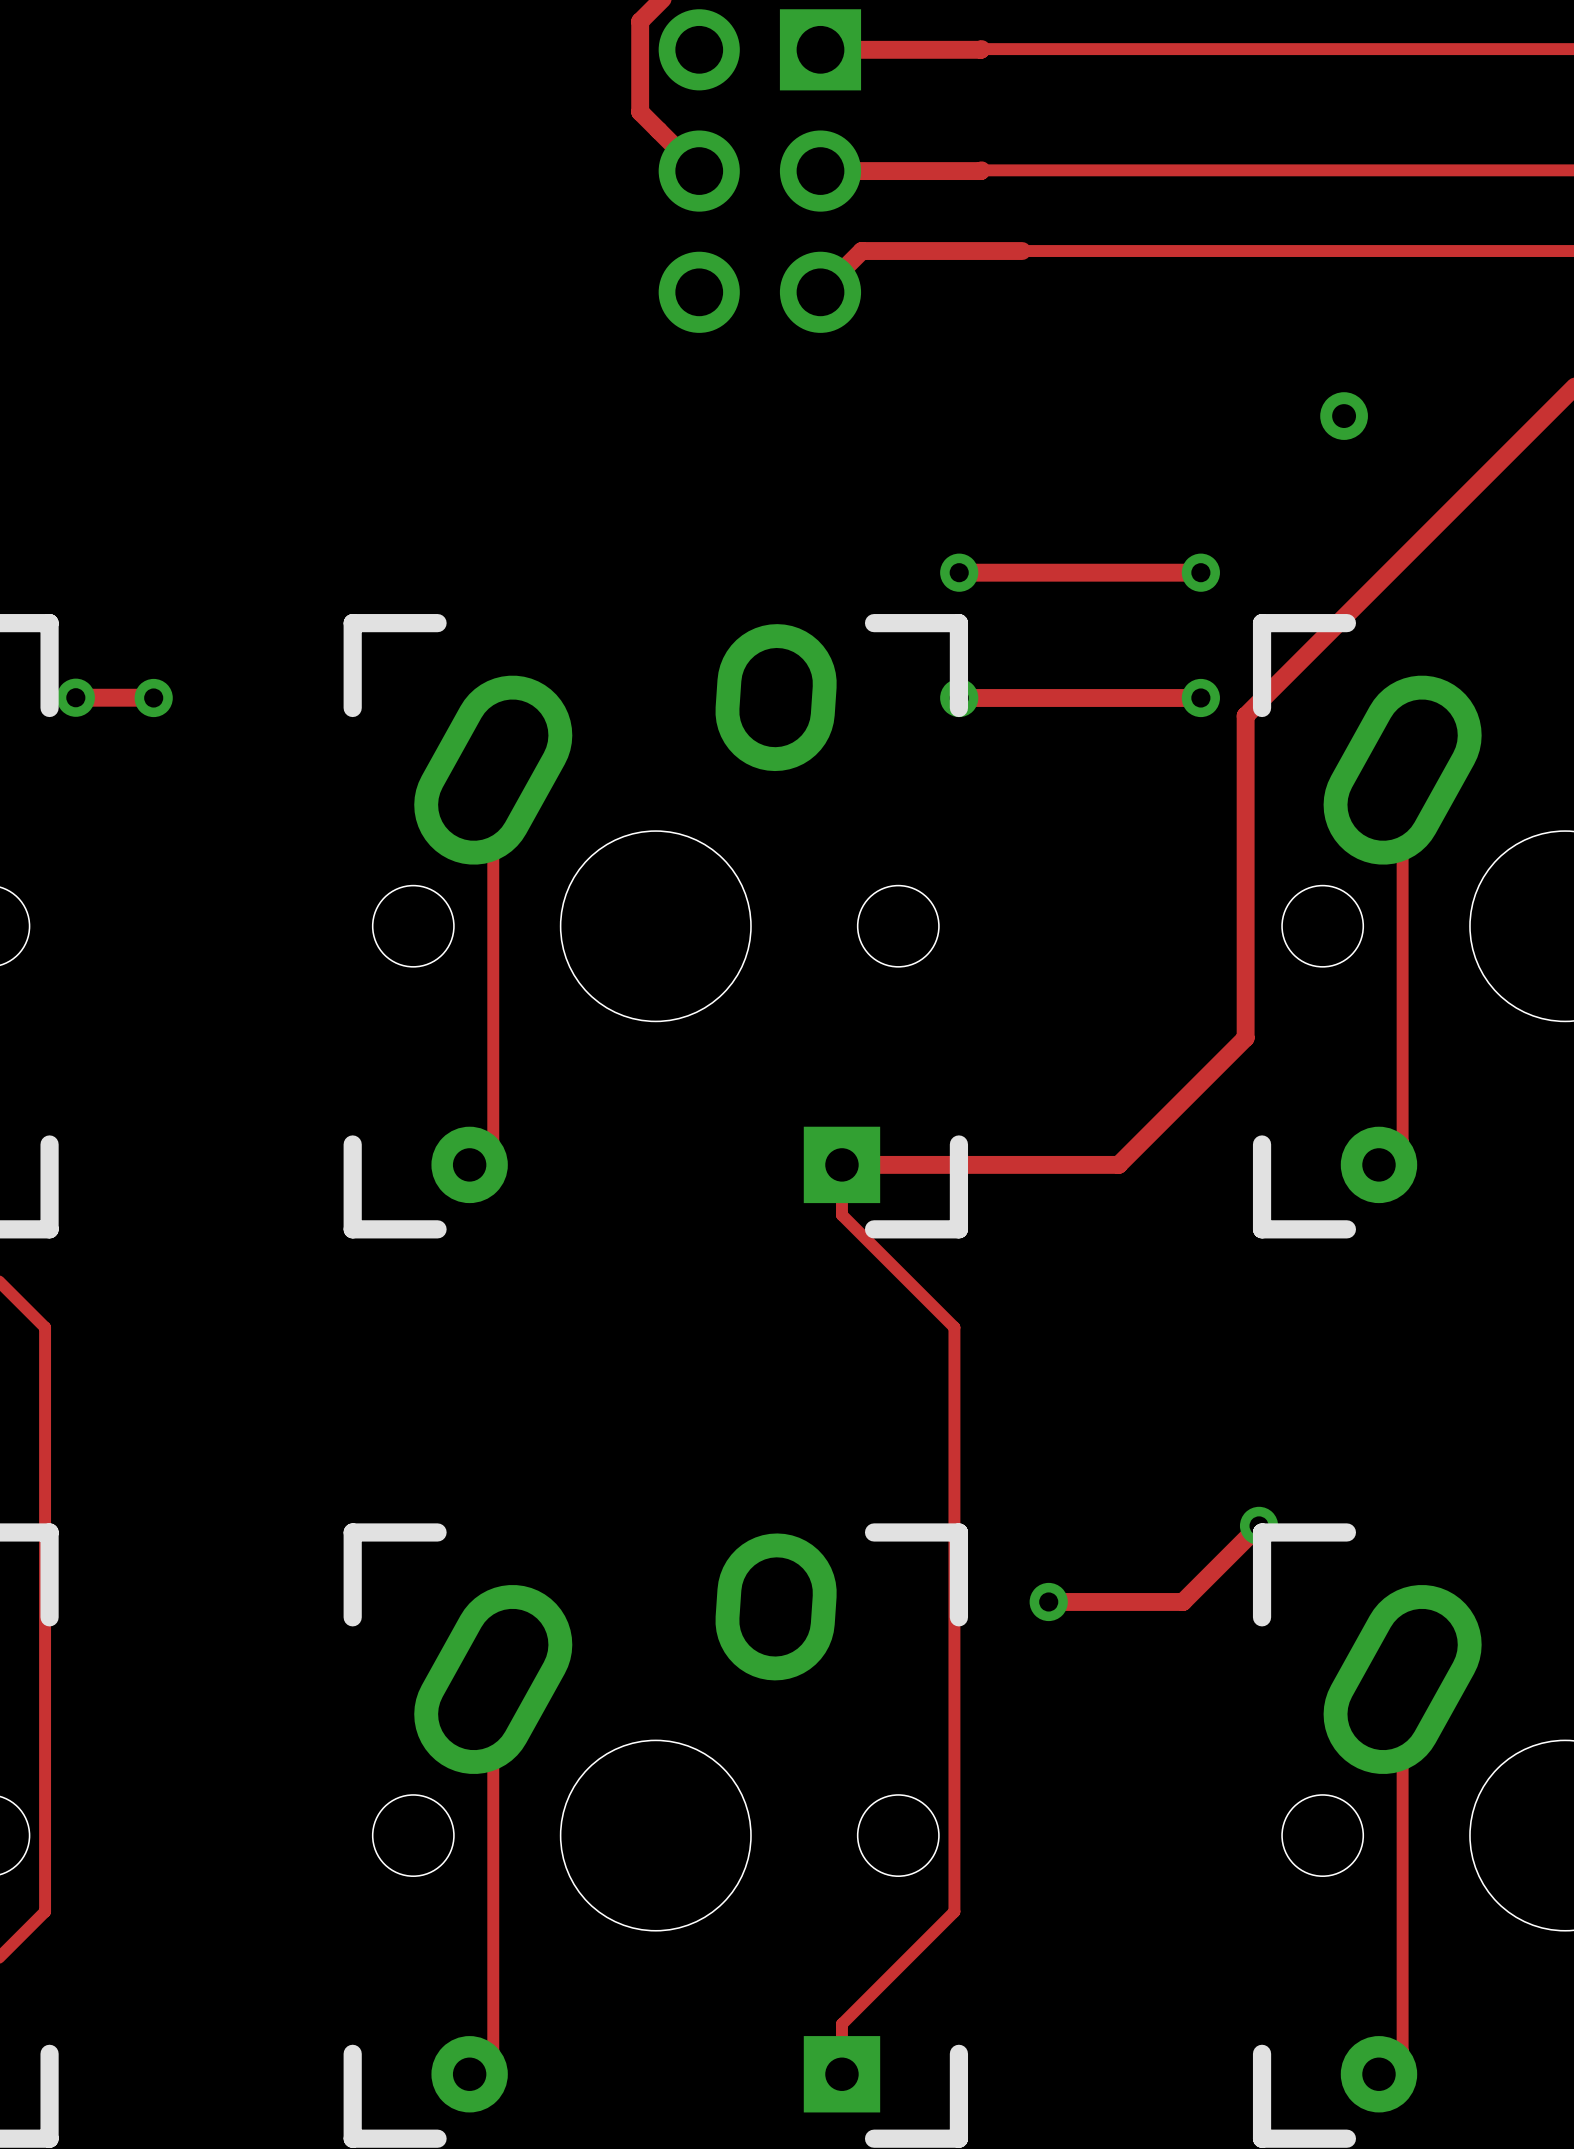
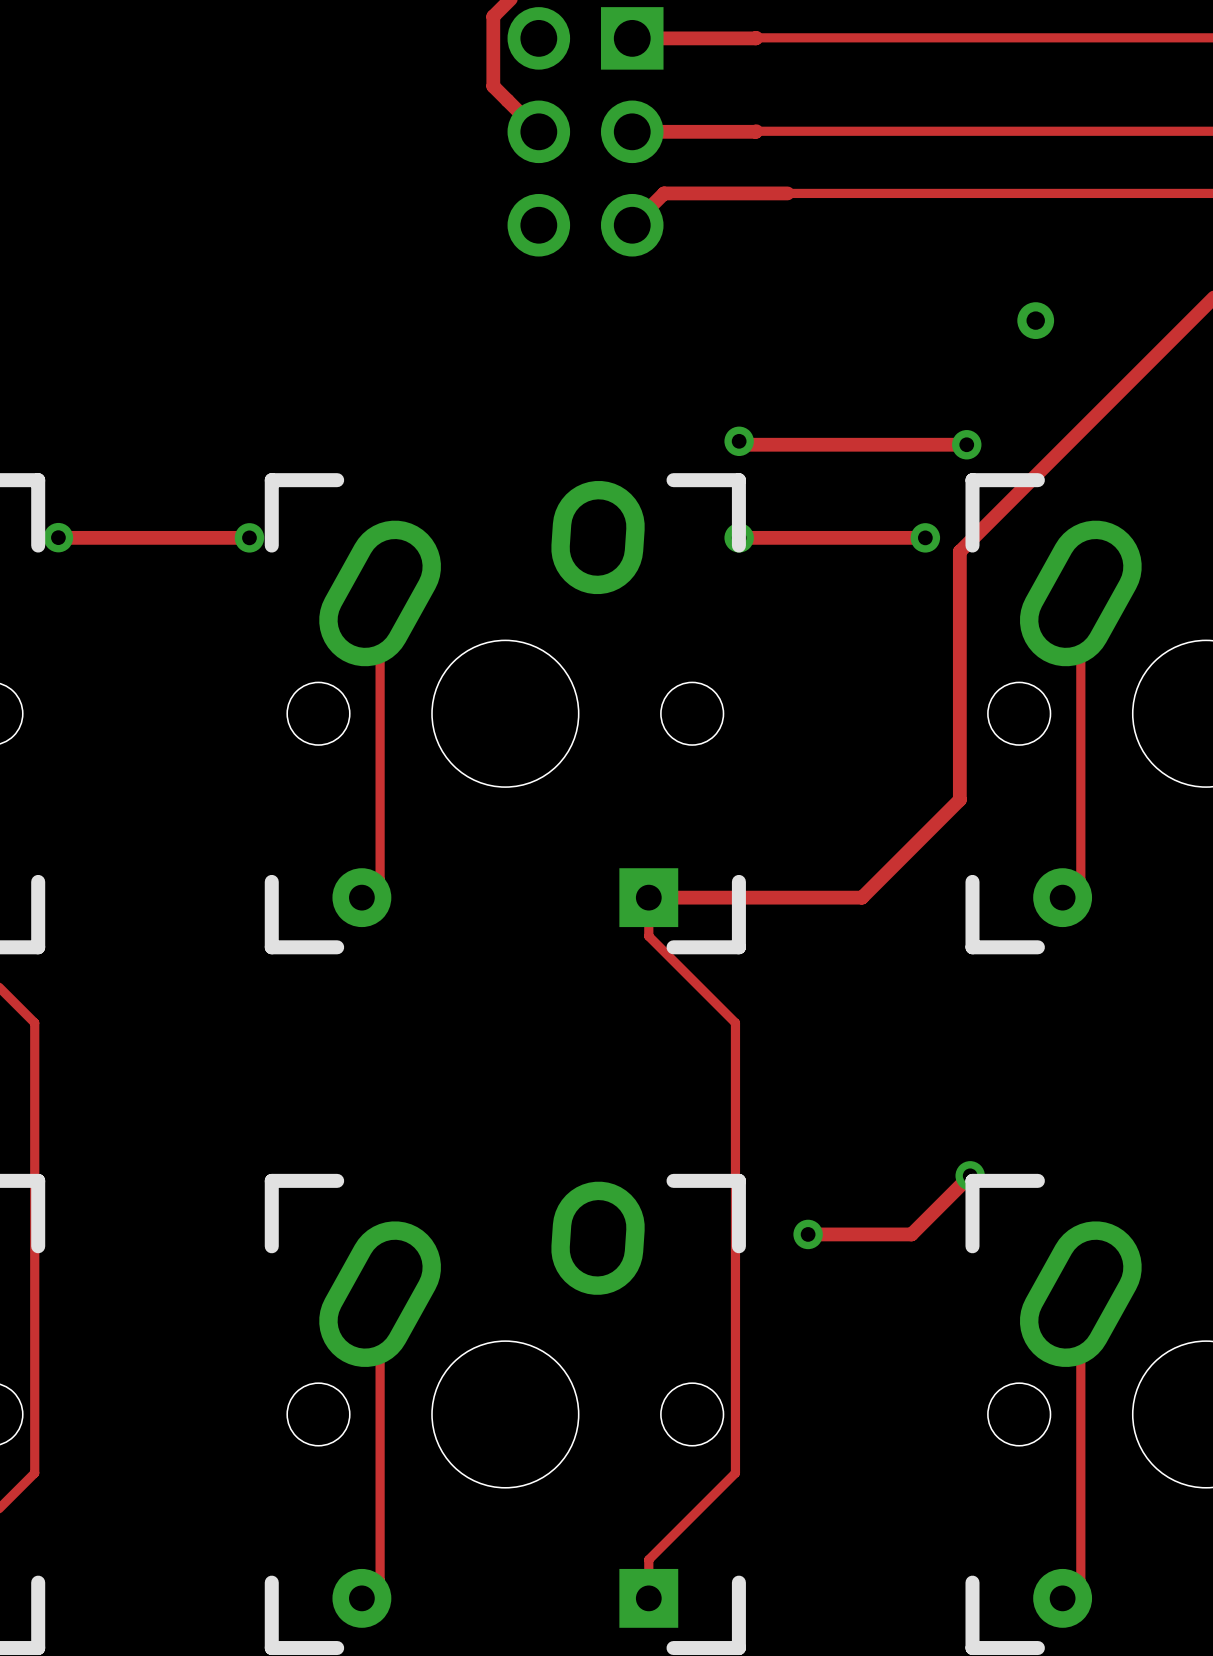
track: (959, 572) (1200, 572) -> (739, 441) (742, 444) (966, 444)
via position: (1200, 572) -> (966, 444)
track: (75, 697) (153, 697) -> (59, 537) (249, 537)
via position: (153, 698) -> (249, 537)

